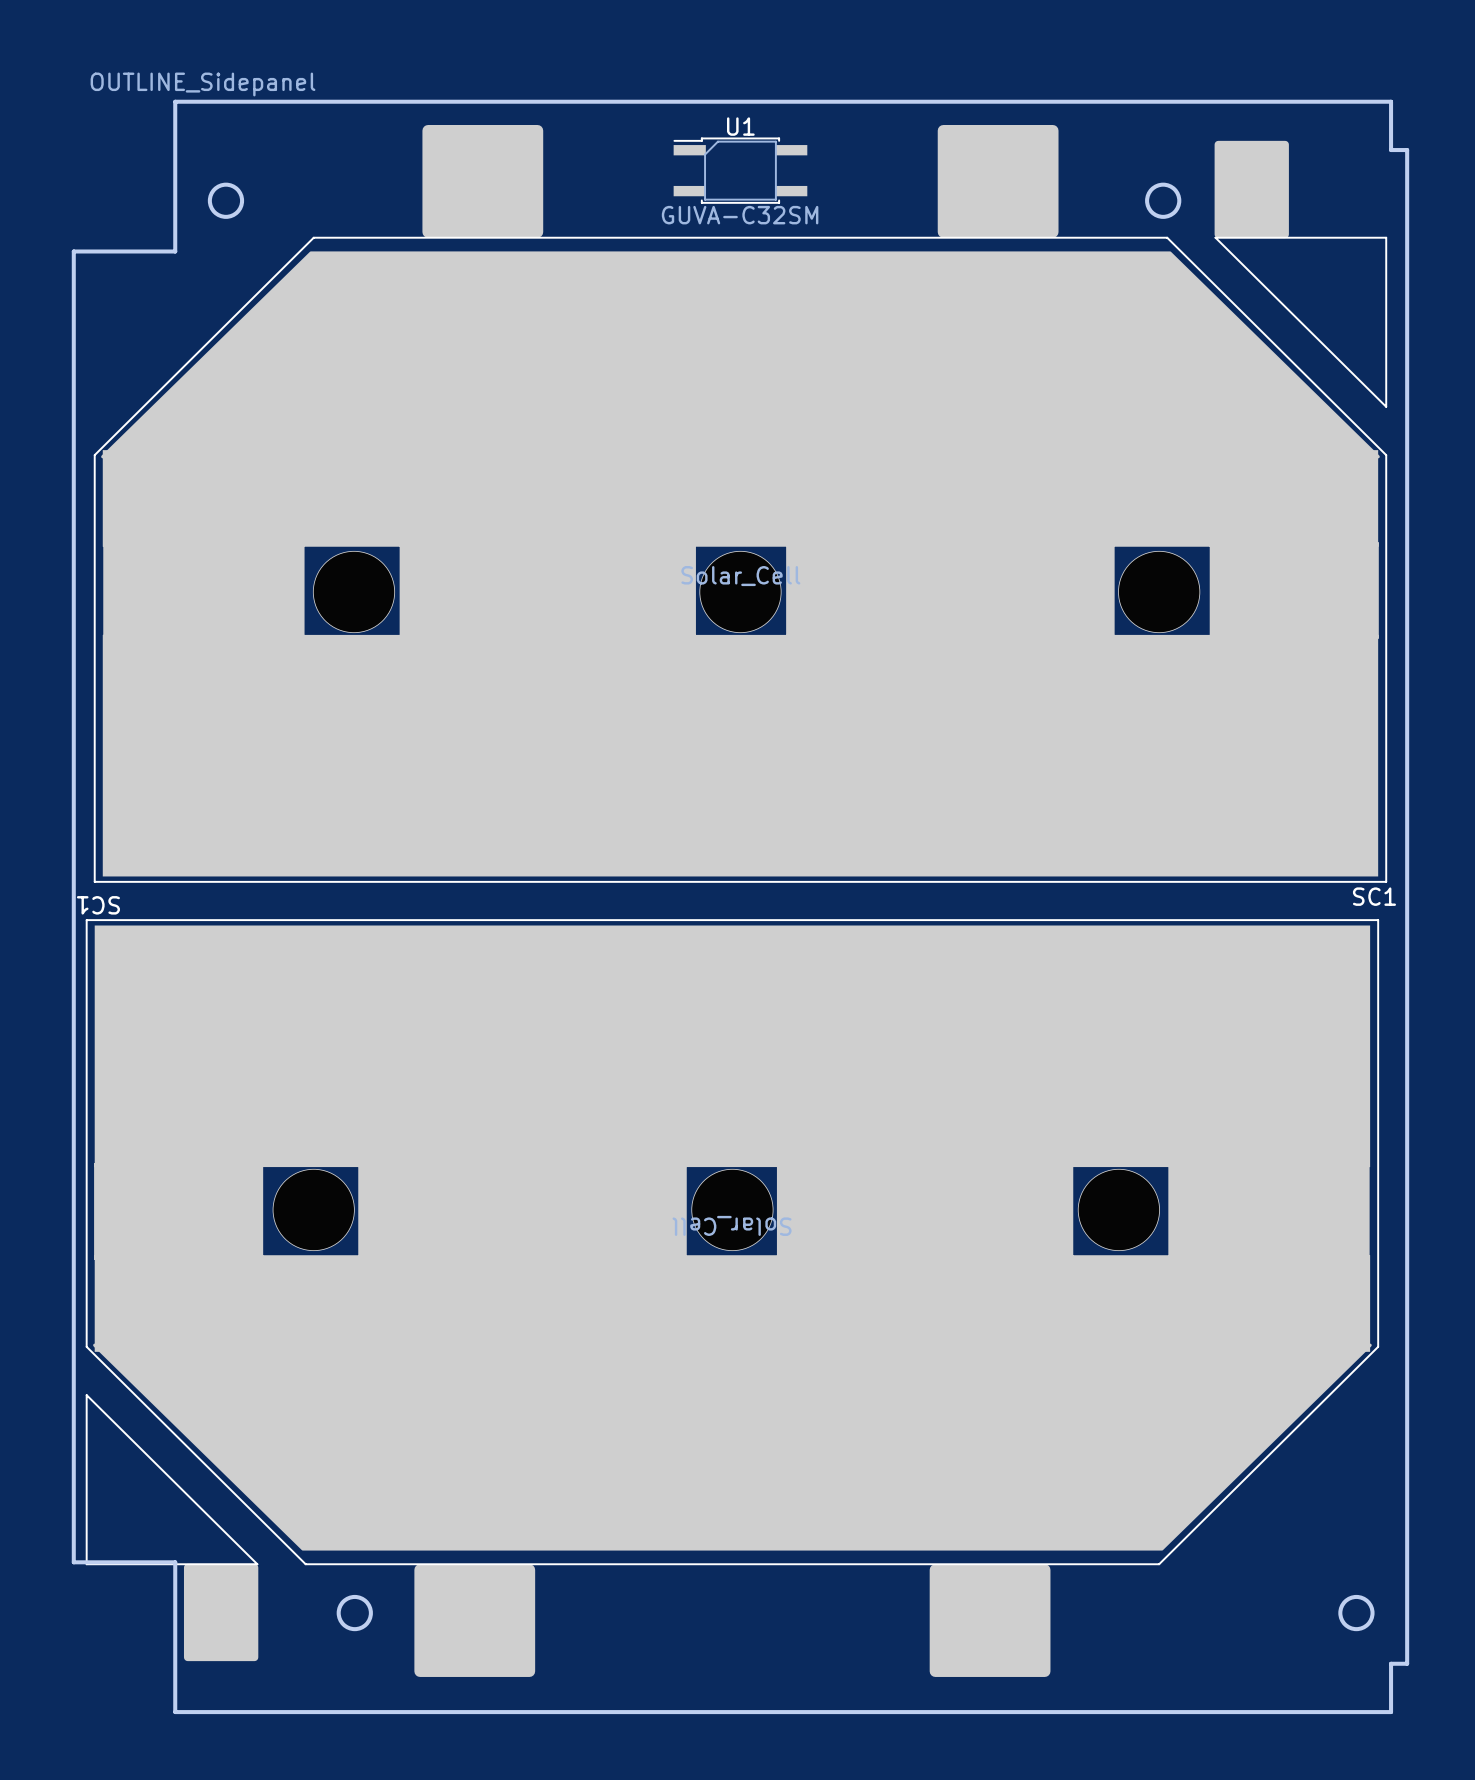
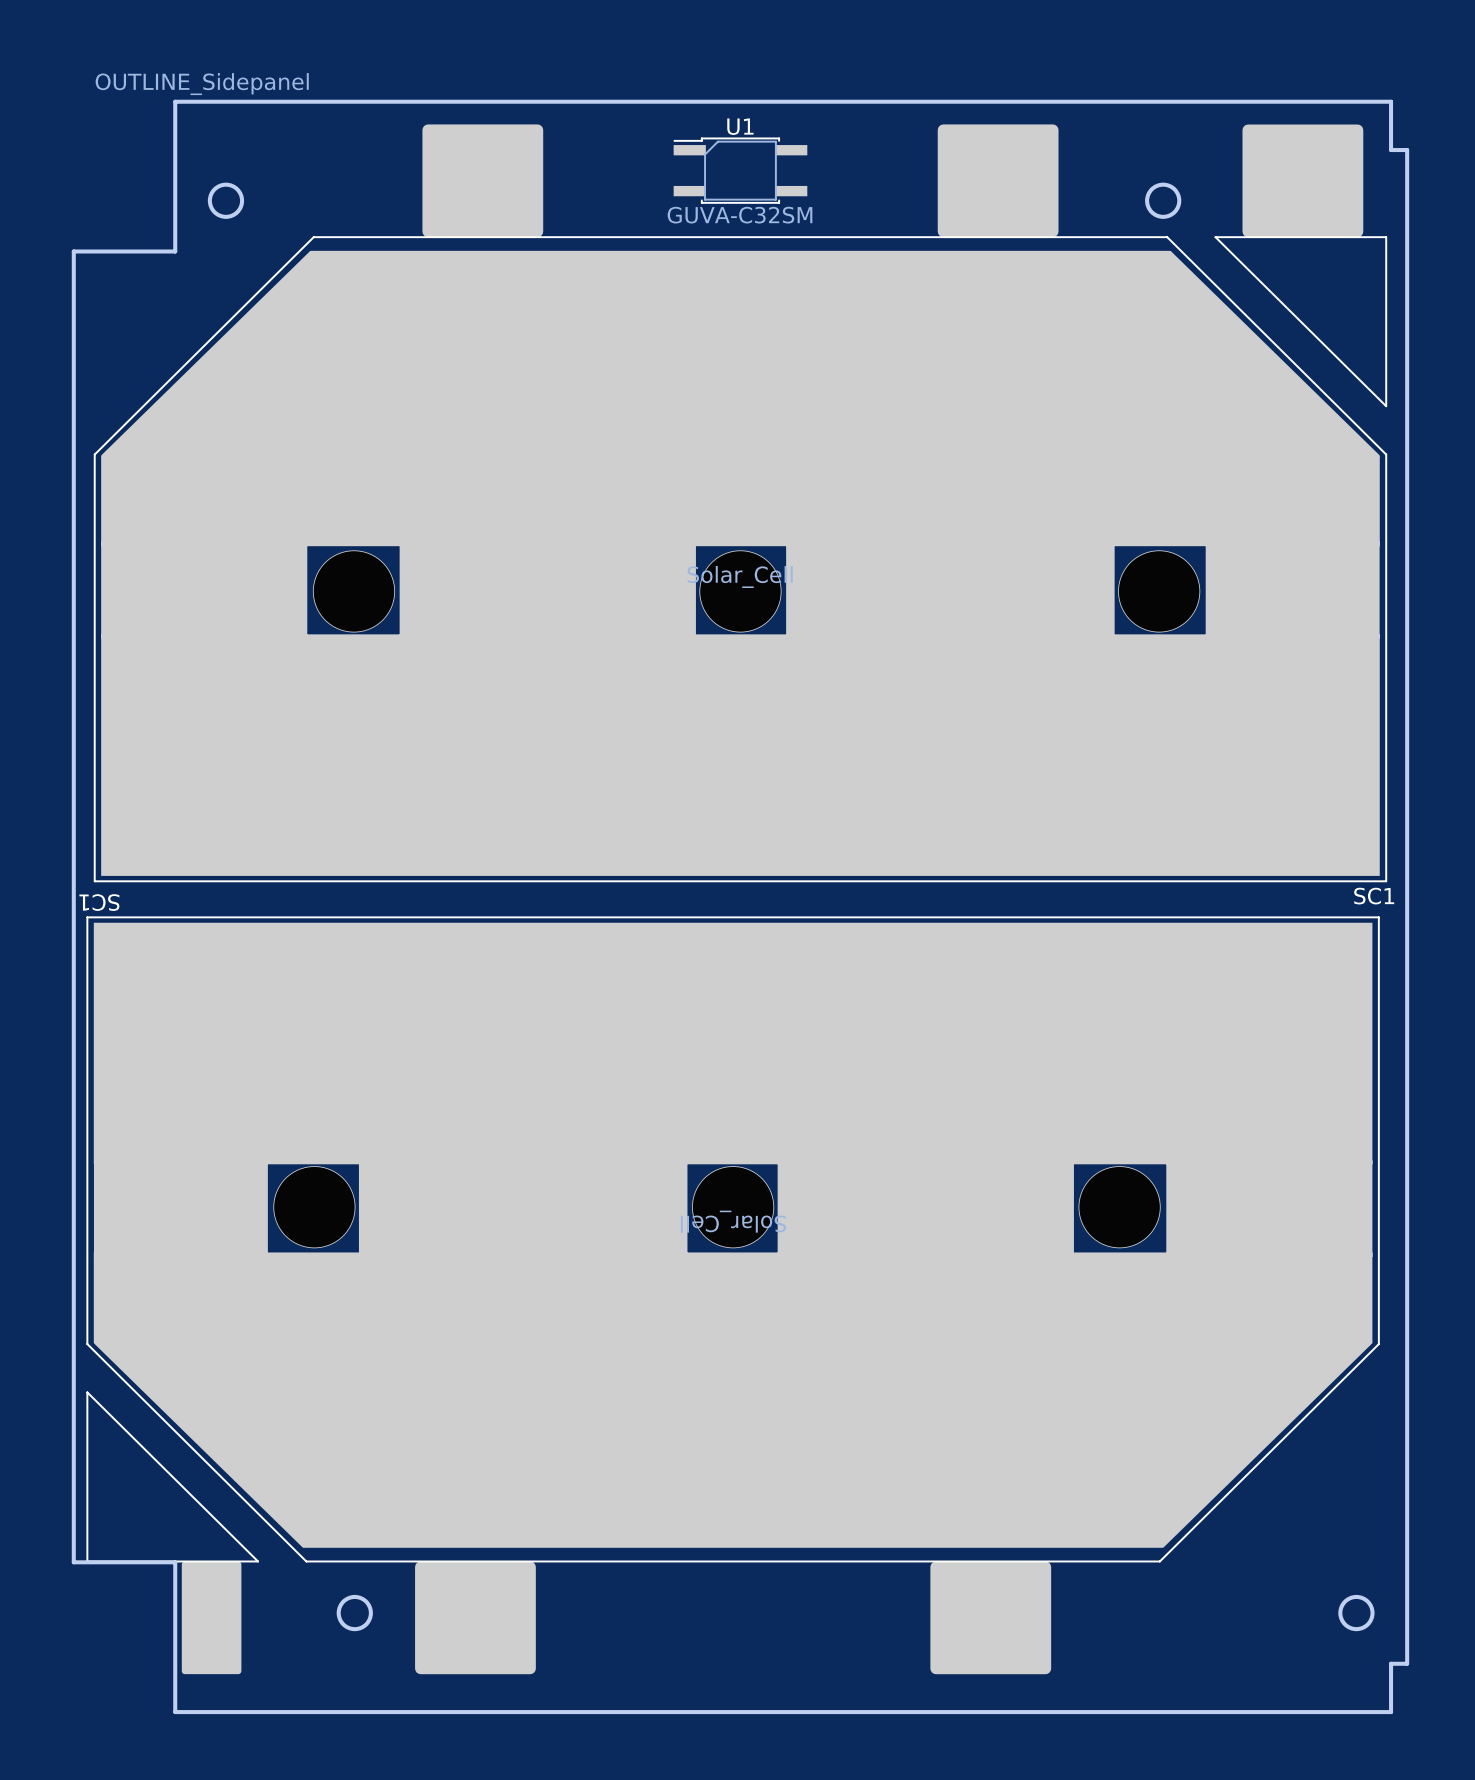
SC1 footprint: [93, 125, 1388, 883] -> [93, 124, 1388, 883]
SC1 footprint: [85, 919, 1380, 1677] -> [86, 916, 1380, 1675]

